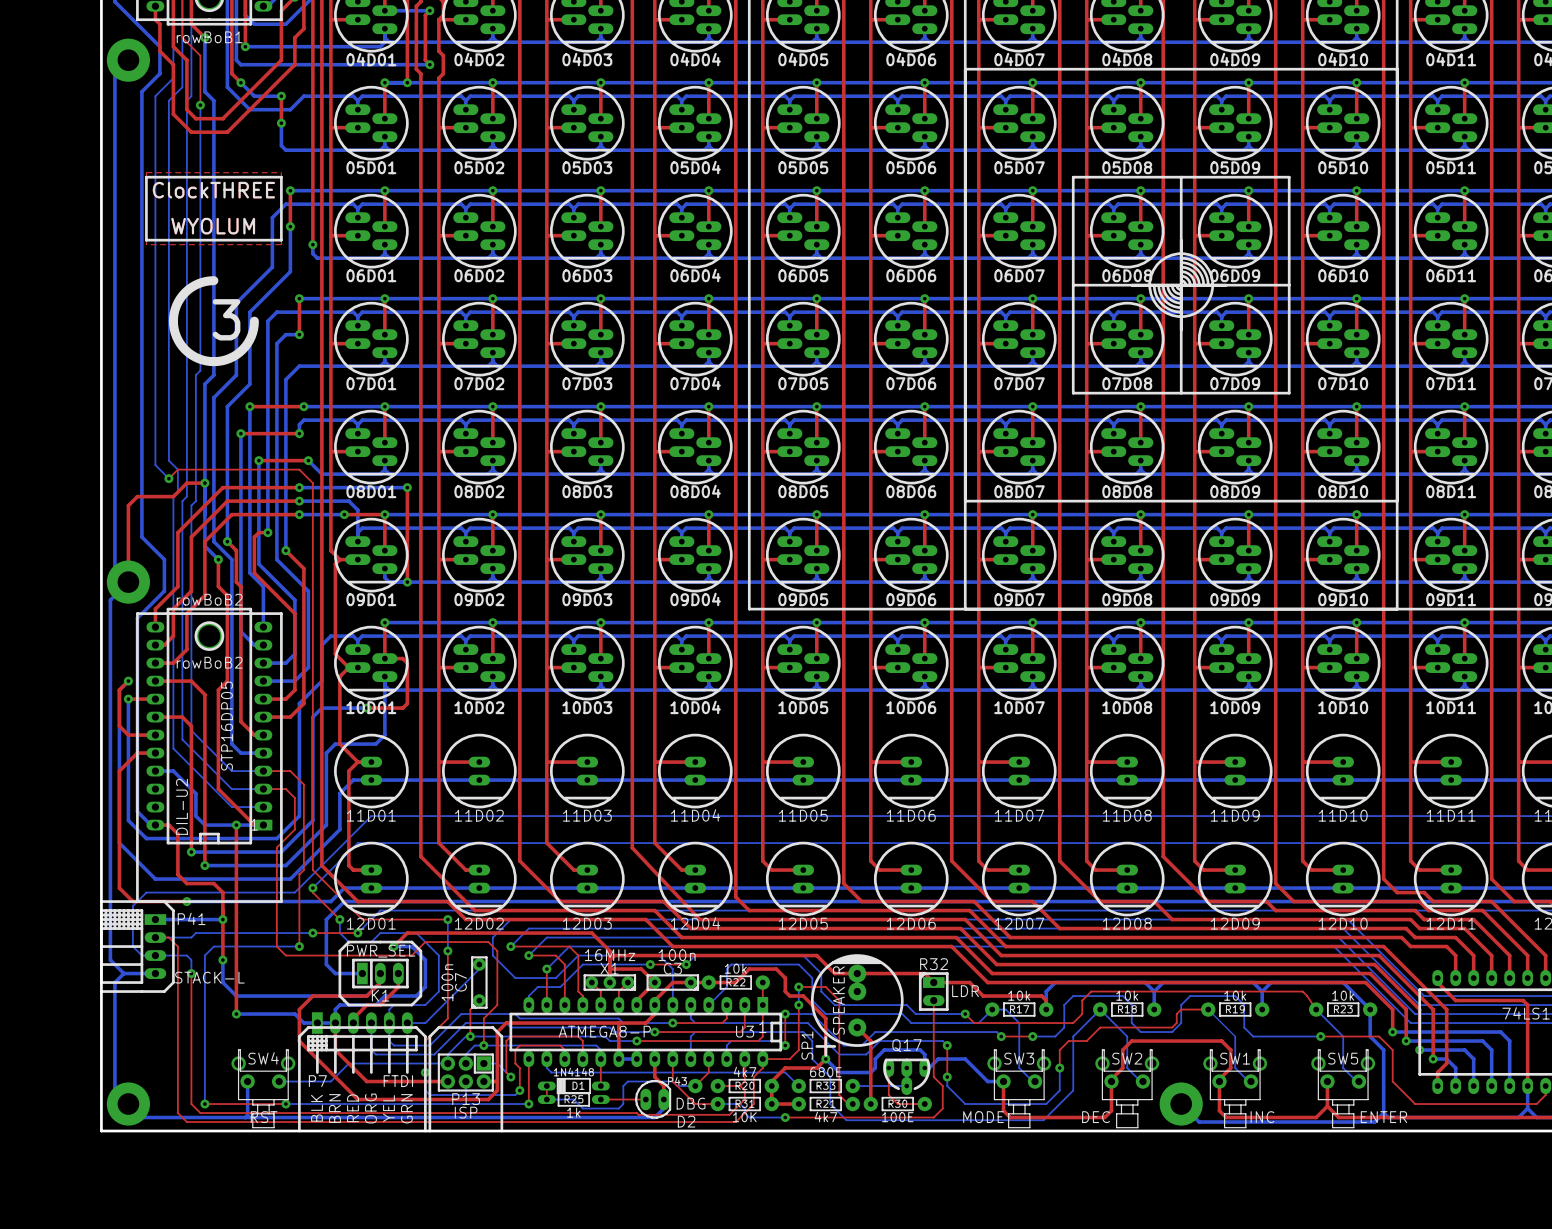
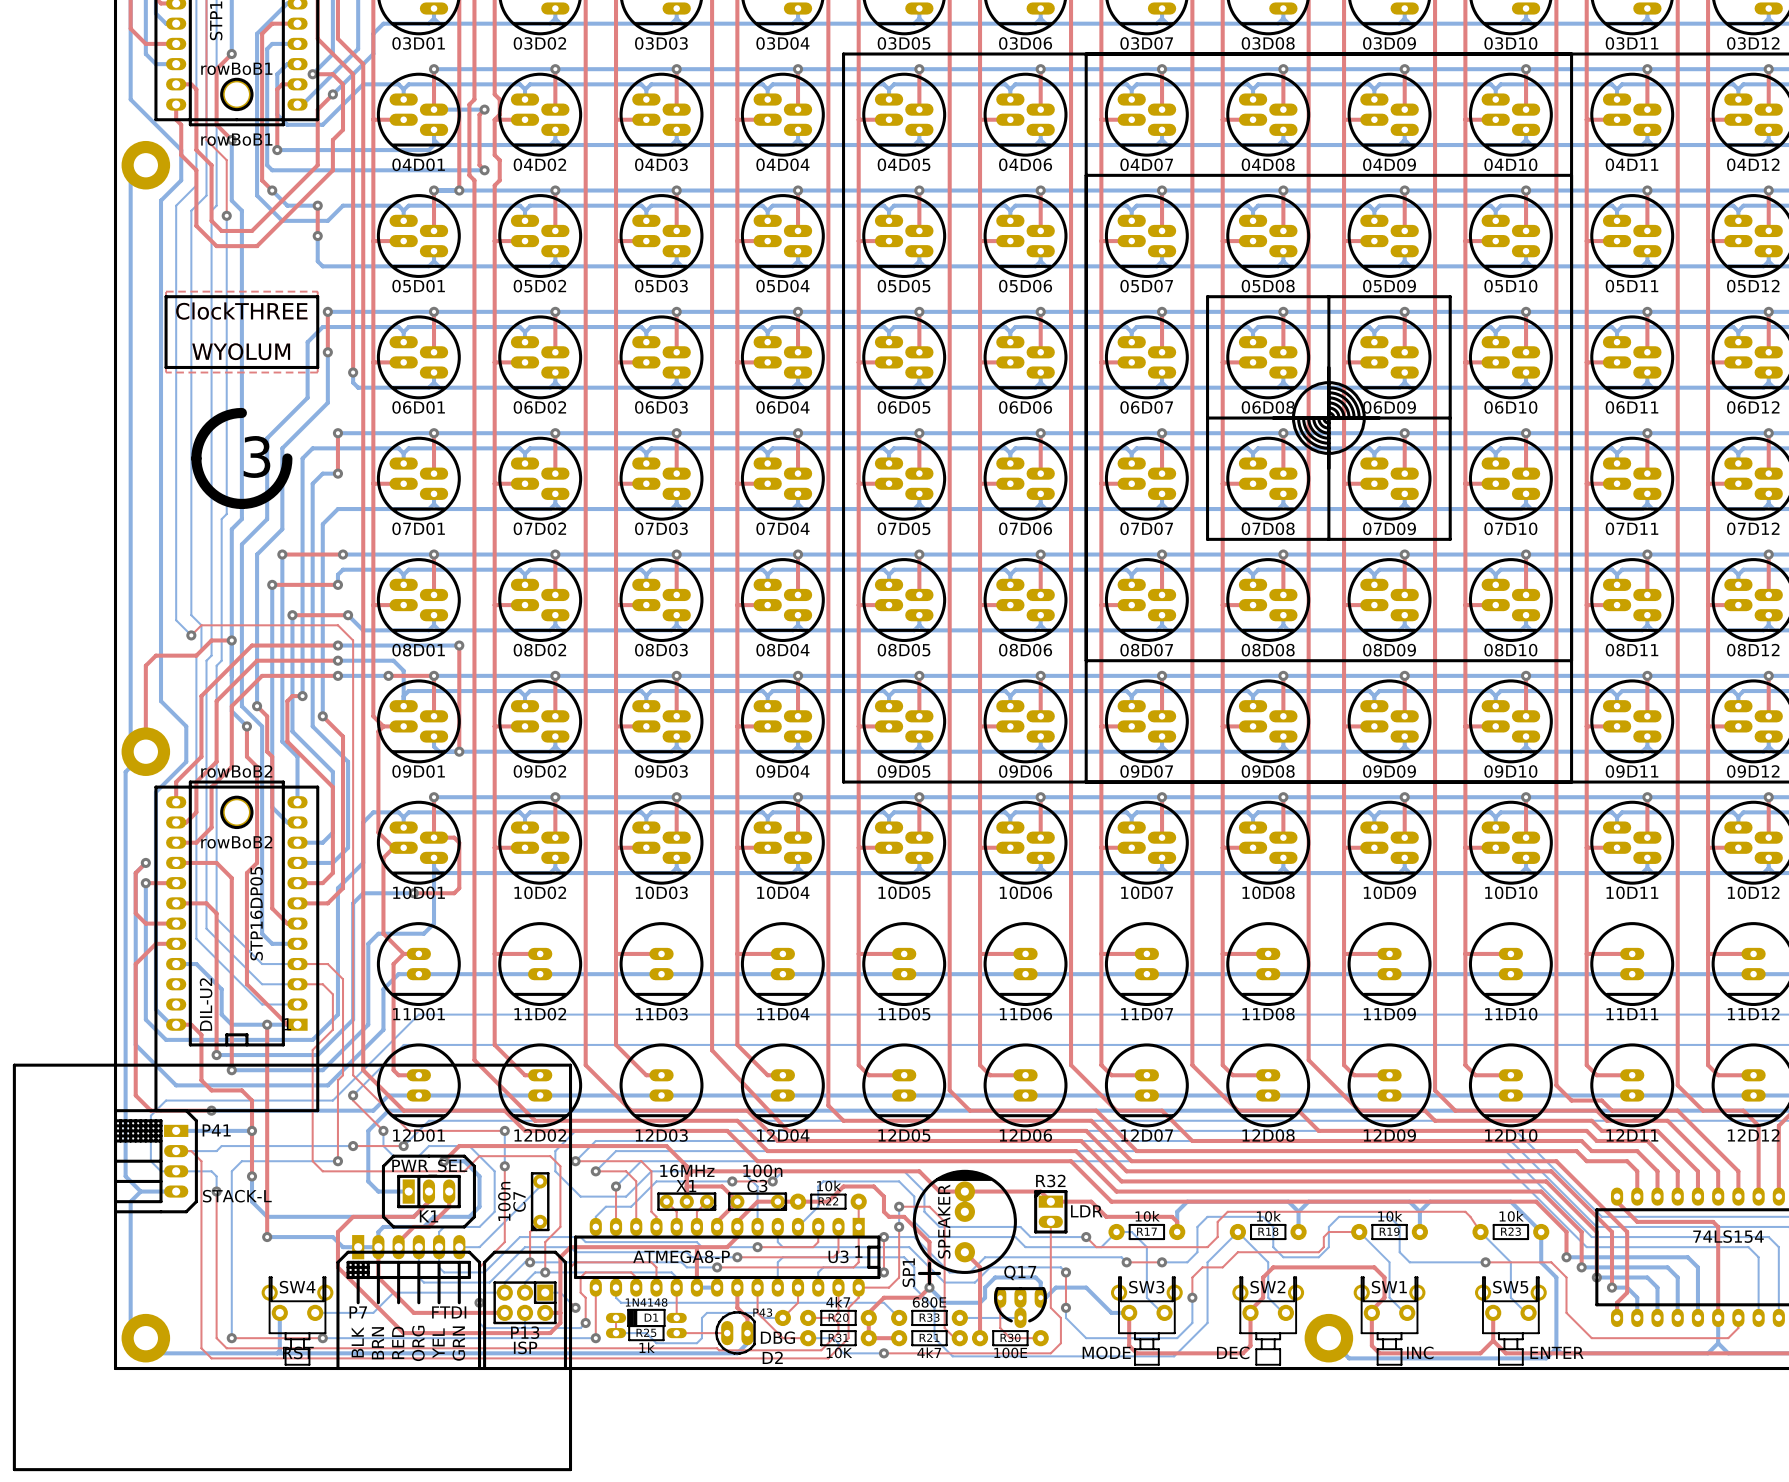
board edge: none -> (14, 1065) (570, 1065) (570, 1469) (14, 1469) (14, 1065)

